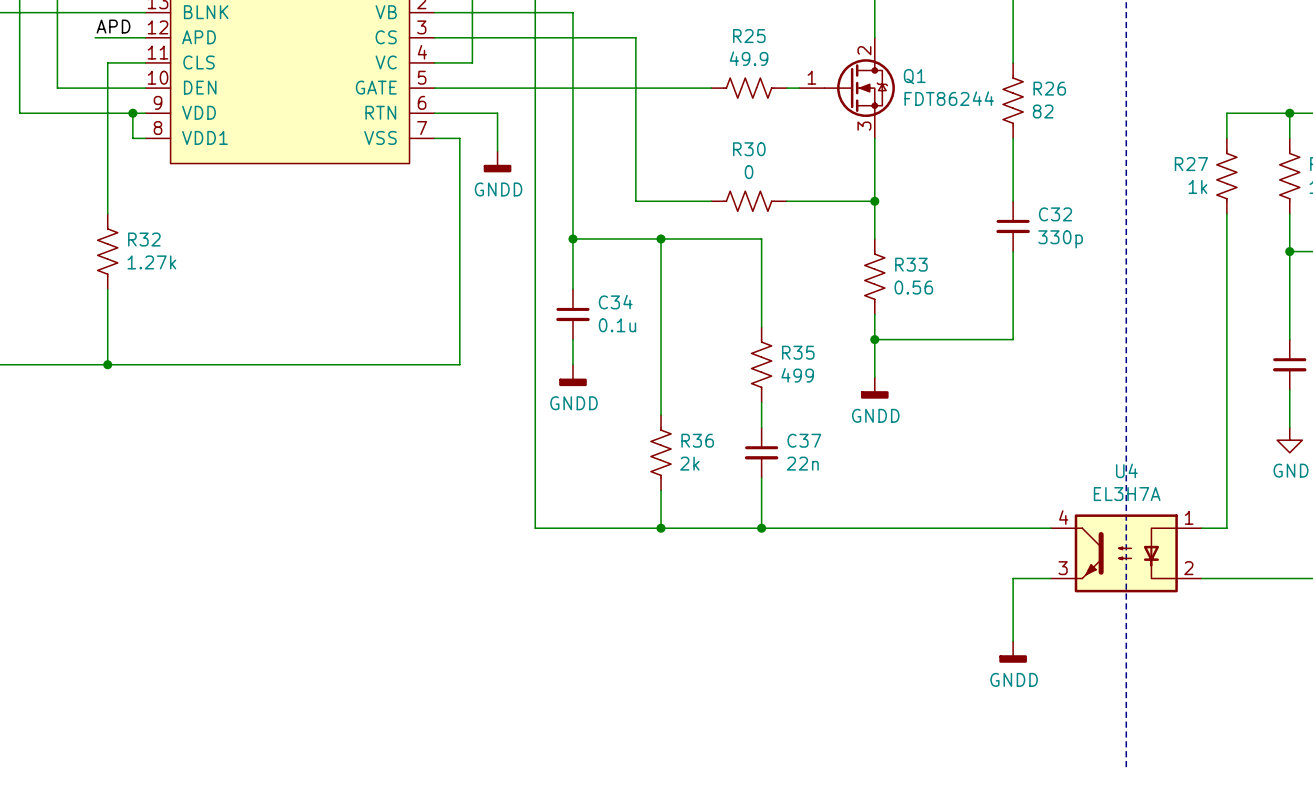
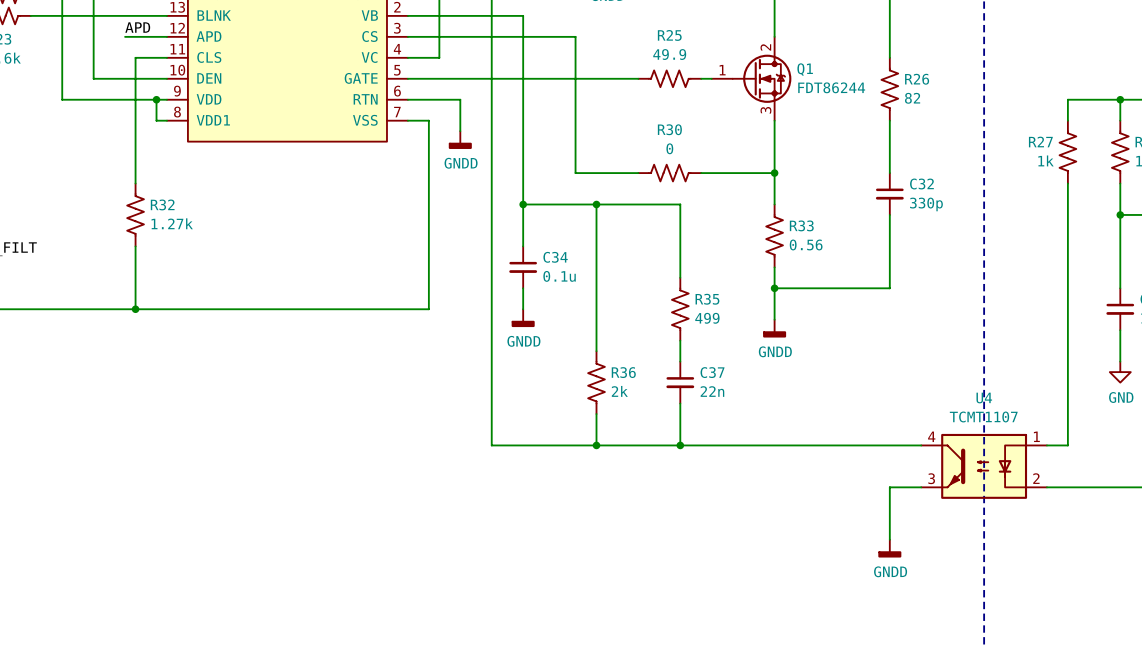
U4 value: EL3H7A (1127, 494) -> TCMT1107 (983, 416)

